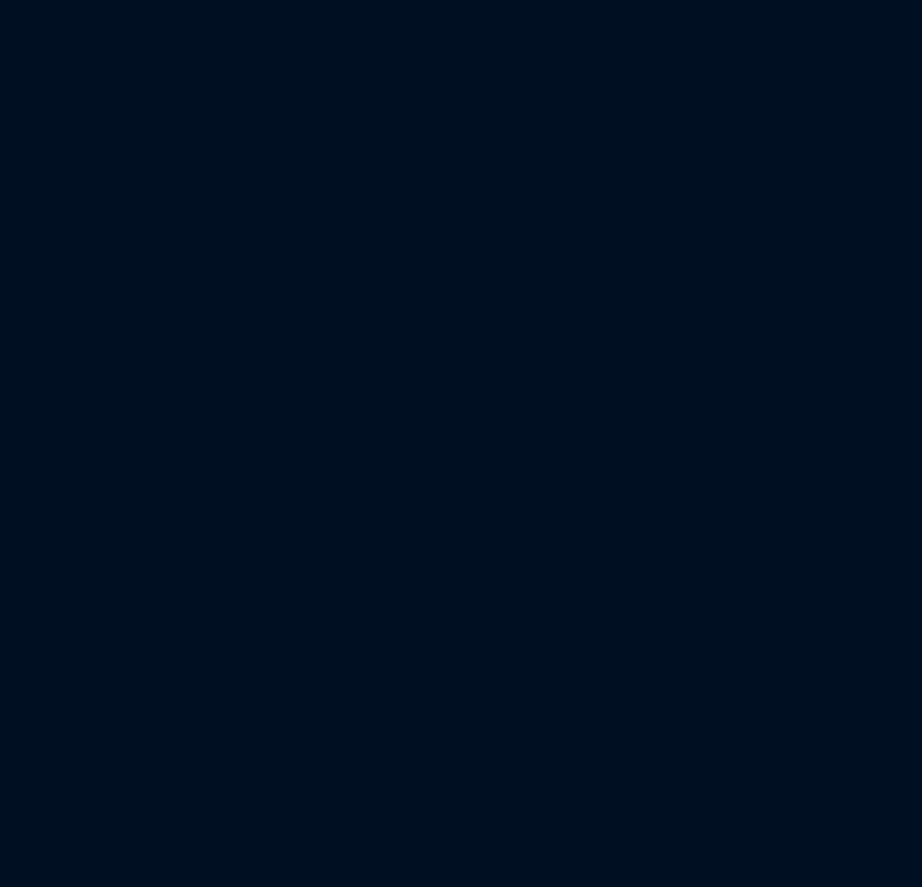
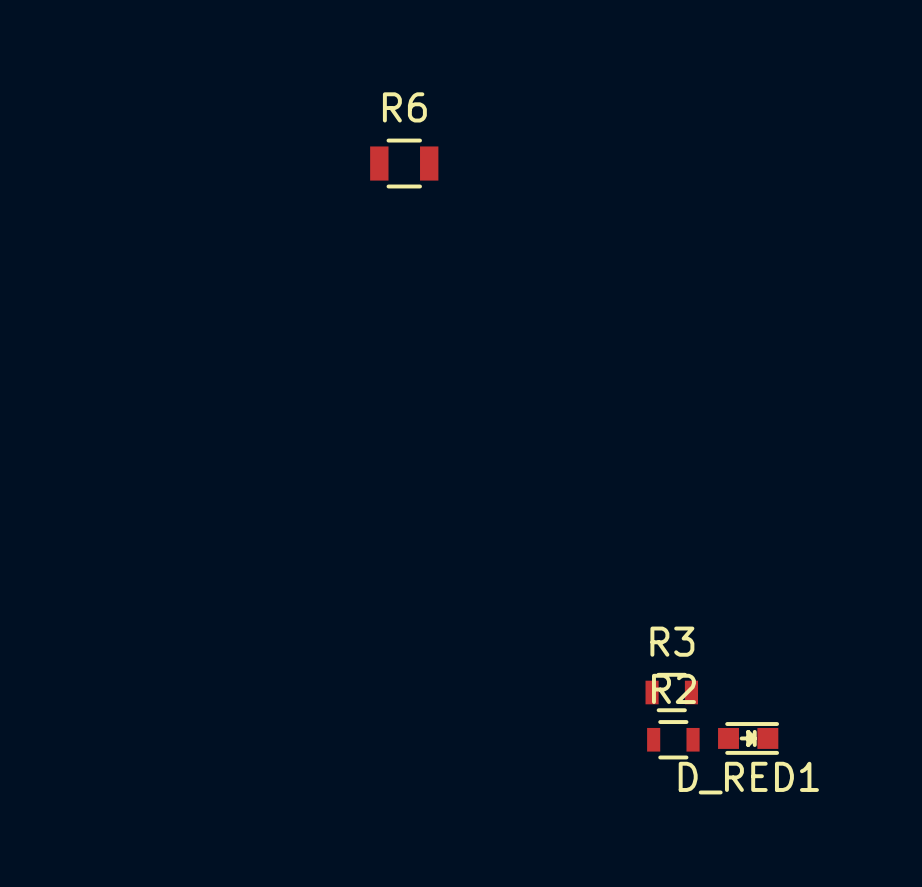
R6: none -> (404, 163)
R3: none -> (671, 692)
D_RED1: none -> (748, 738)
R2: none -> (673, 739)

